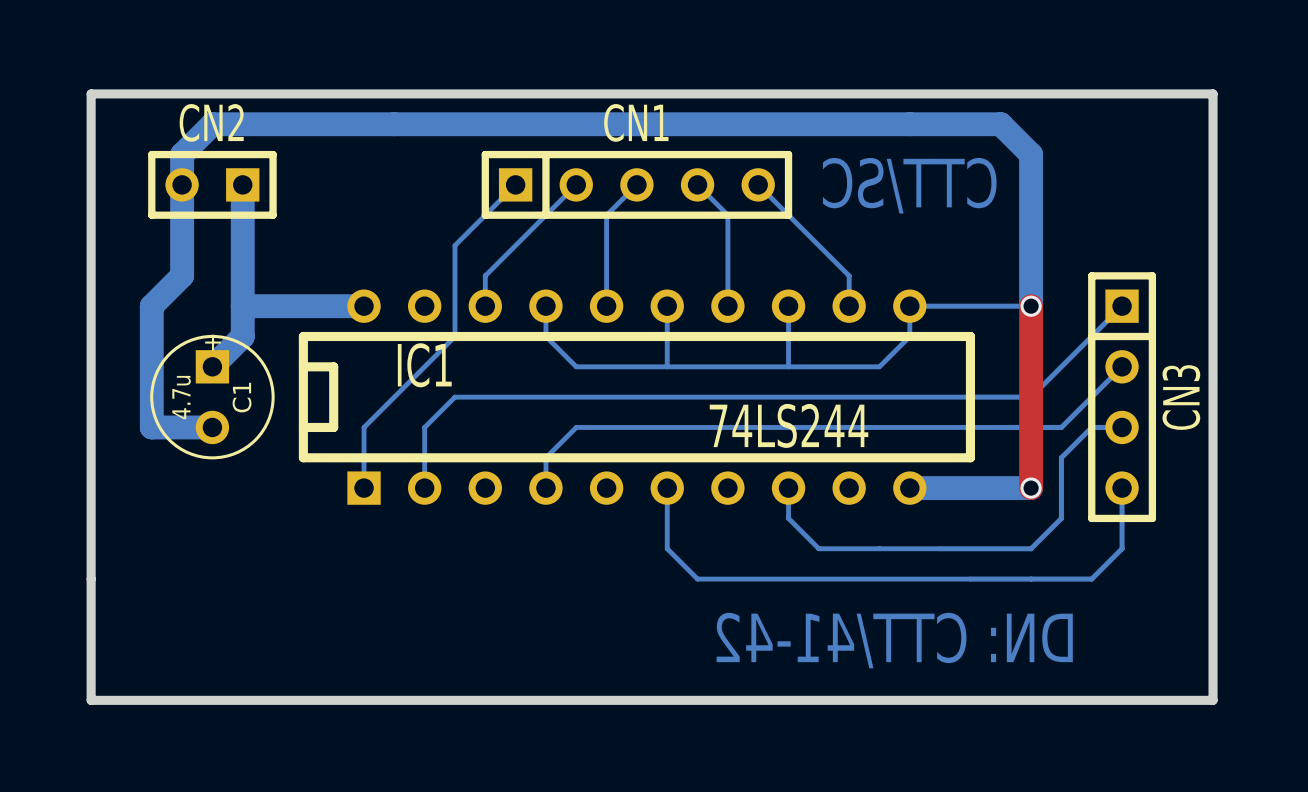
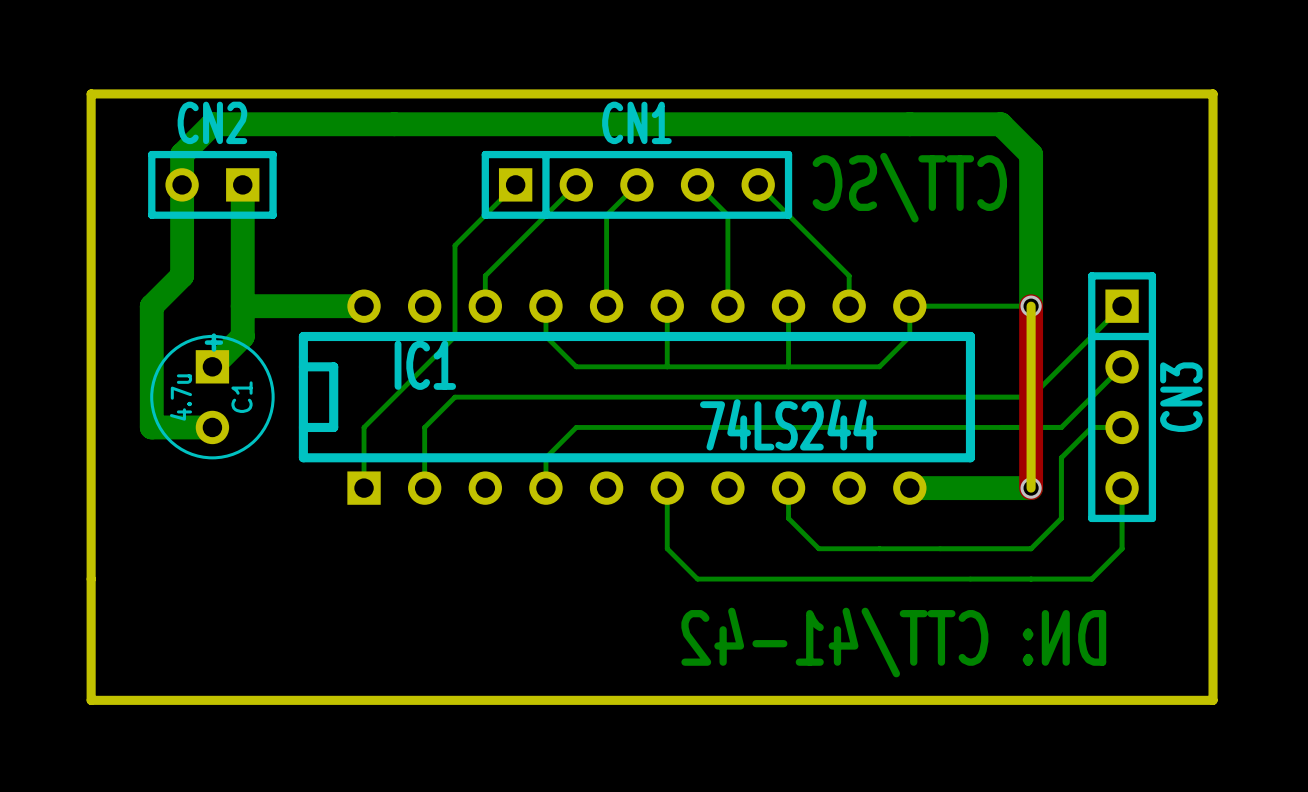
board edge: none -> (1031, 306) (1031, 488)

